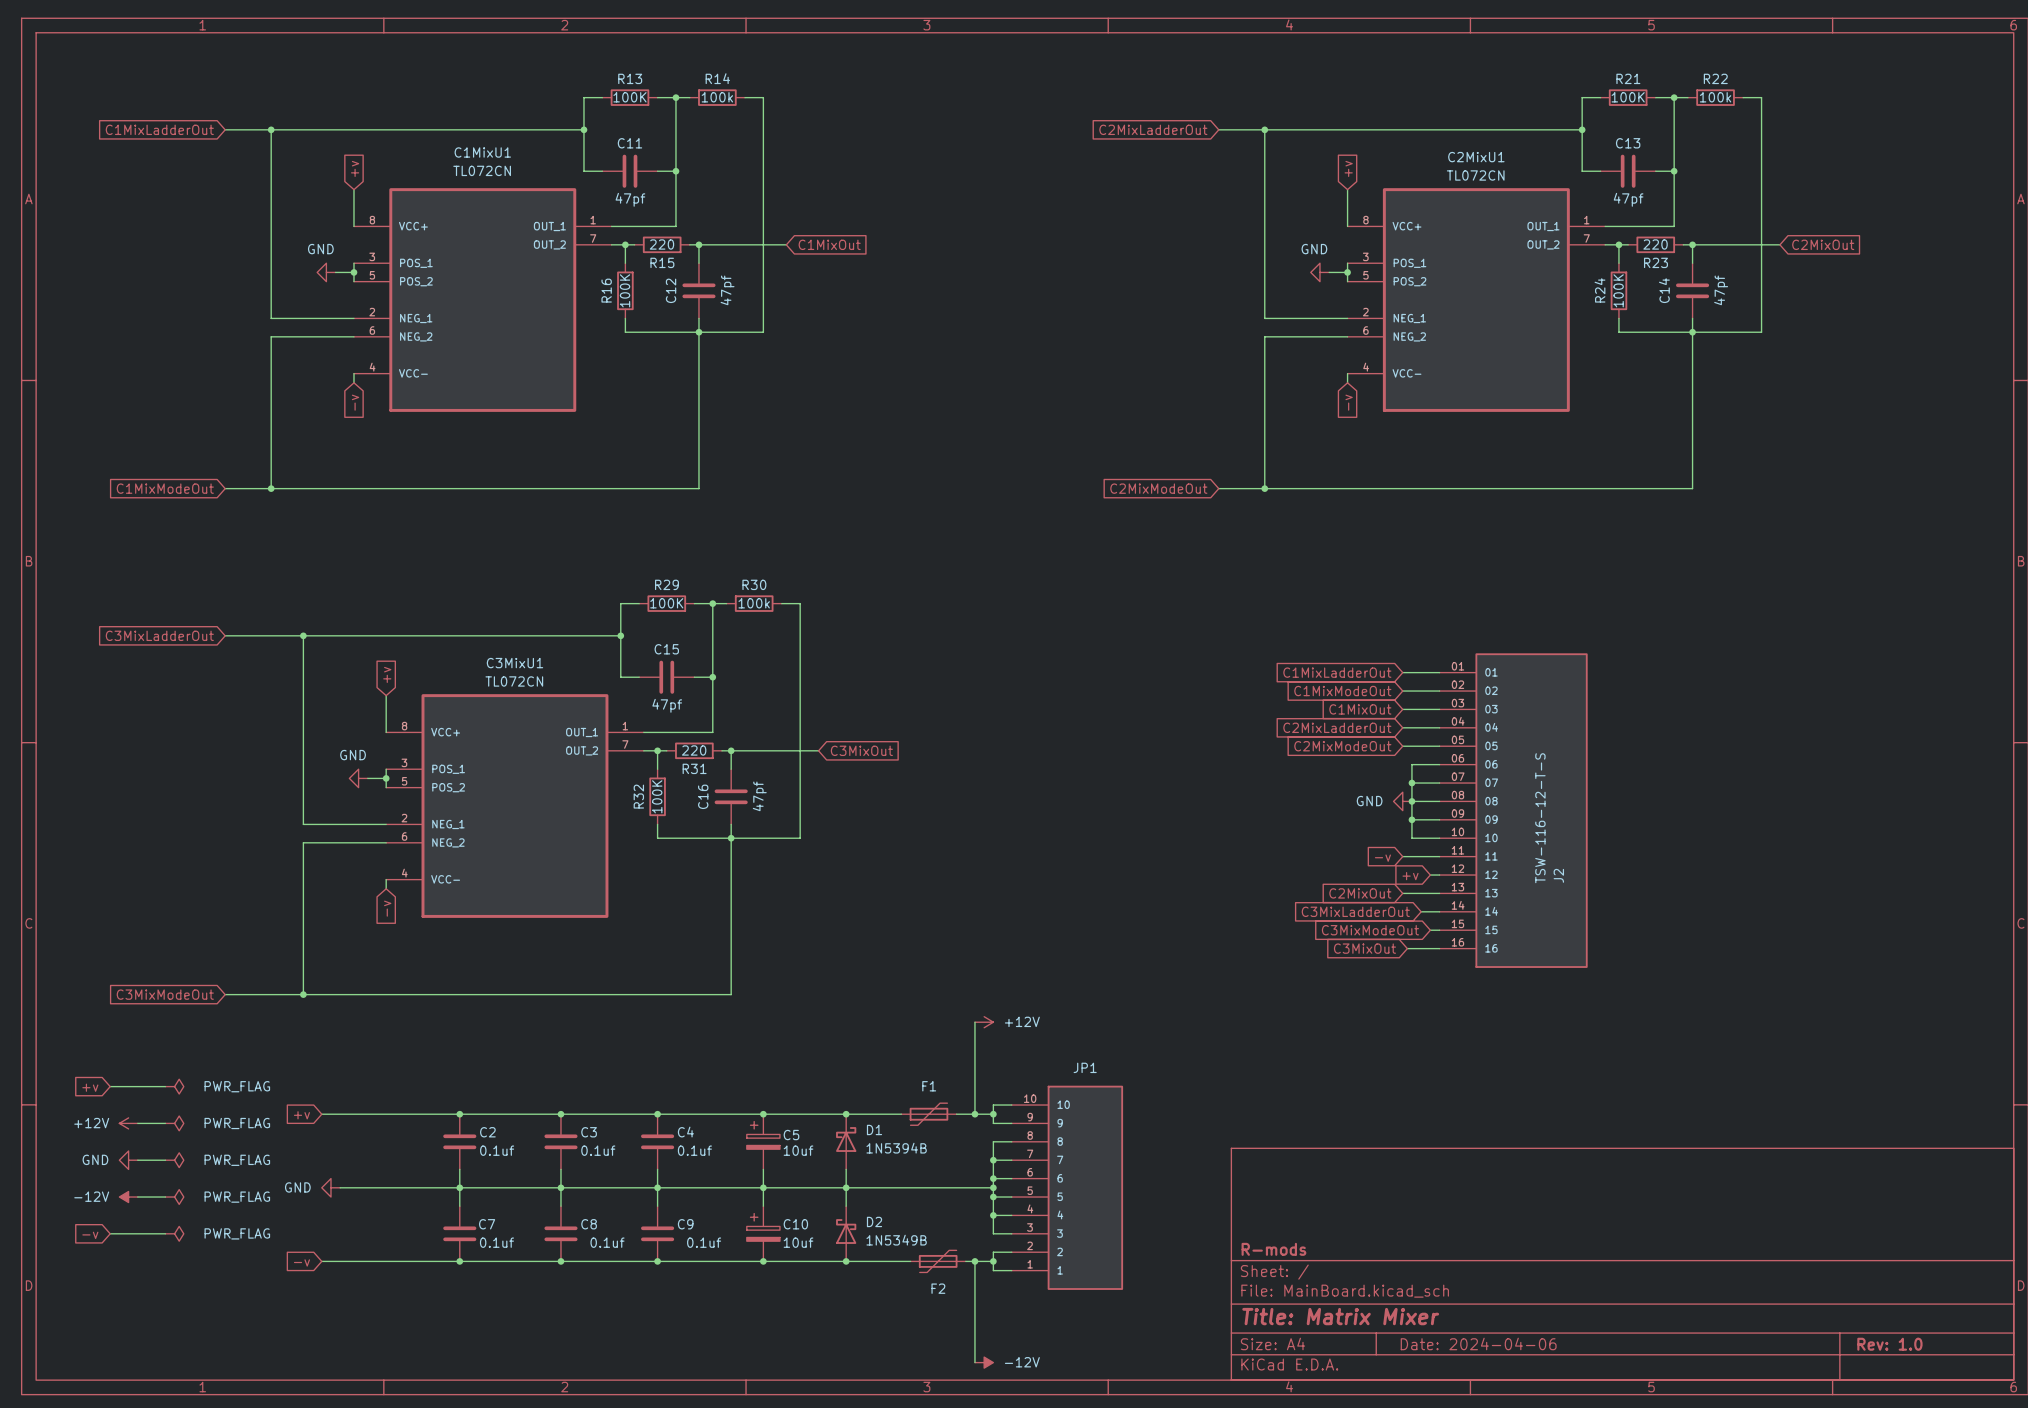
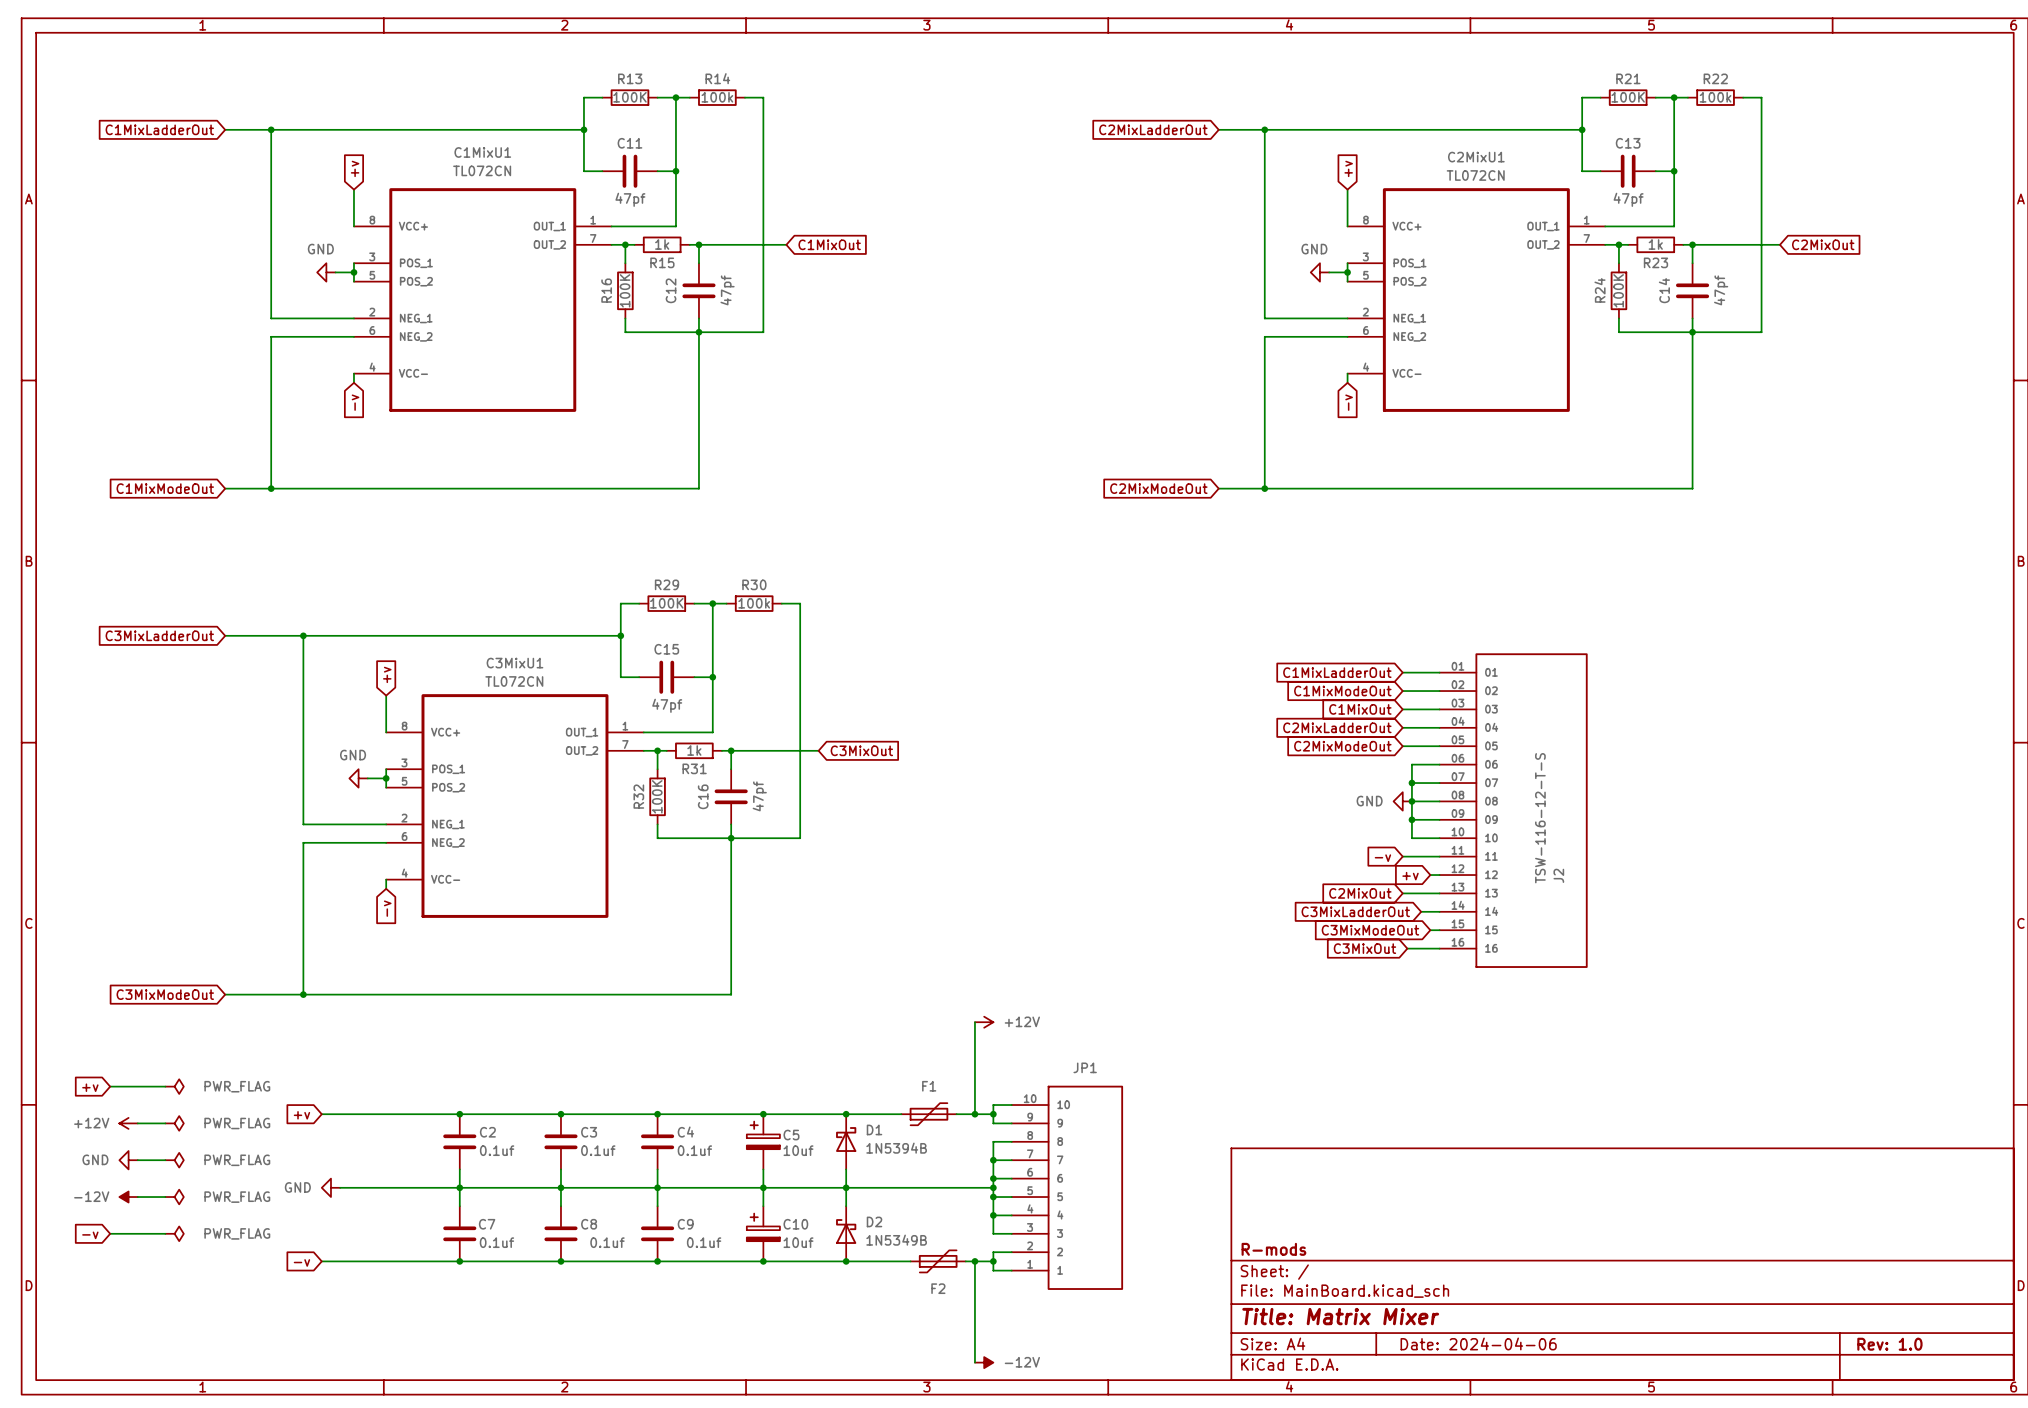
R15 value: 220 (661, 244) -> 1k (662, 244)
R23 value: 220 (1655, 244) -> 1k (1655, 244)
R31 value: 220 (694, 750) -> 1k (694, 750)

